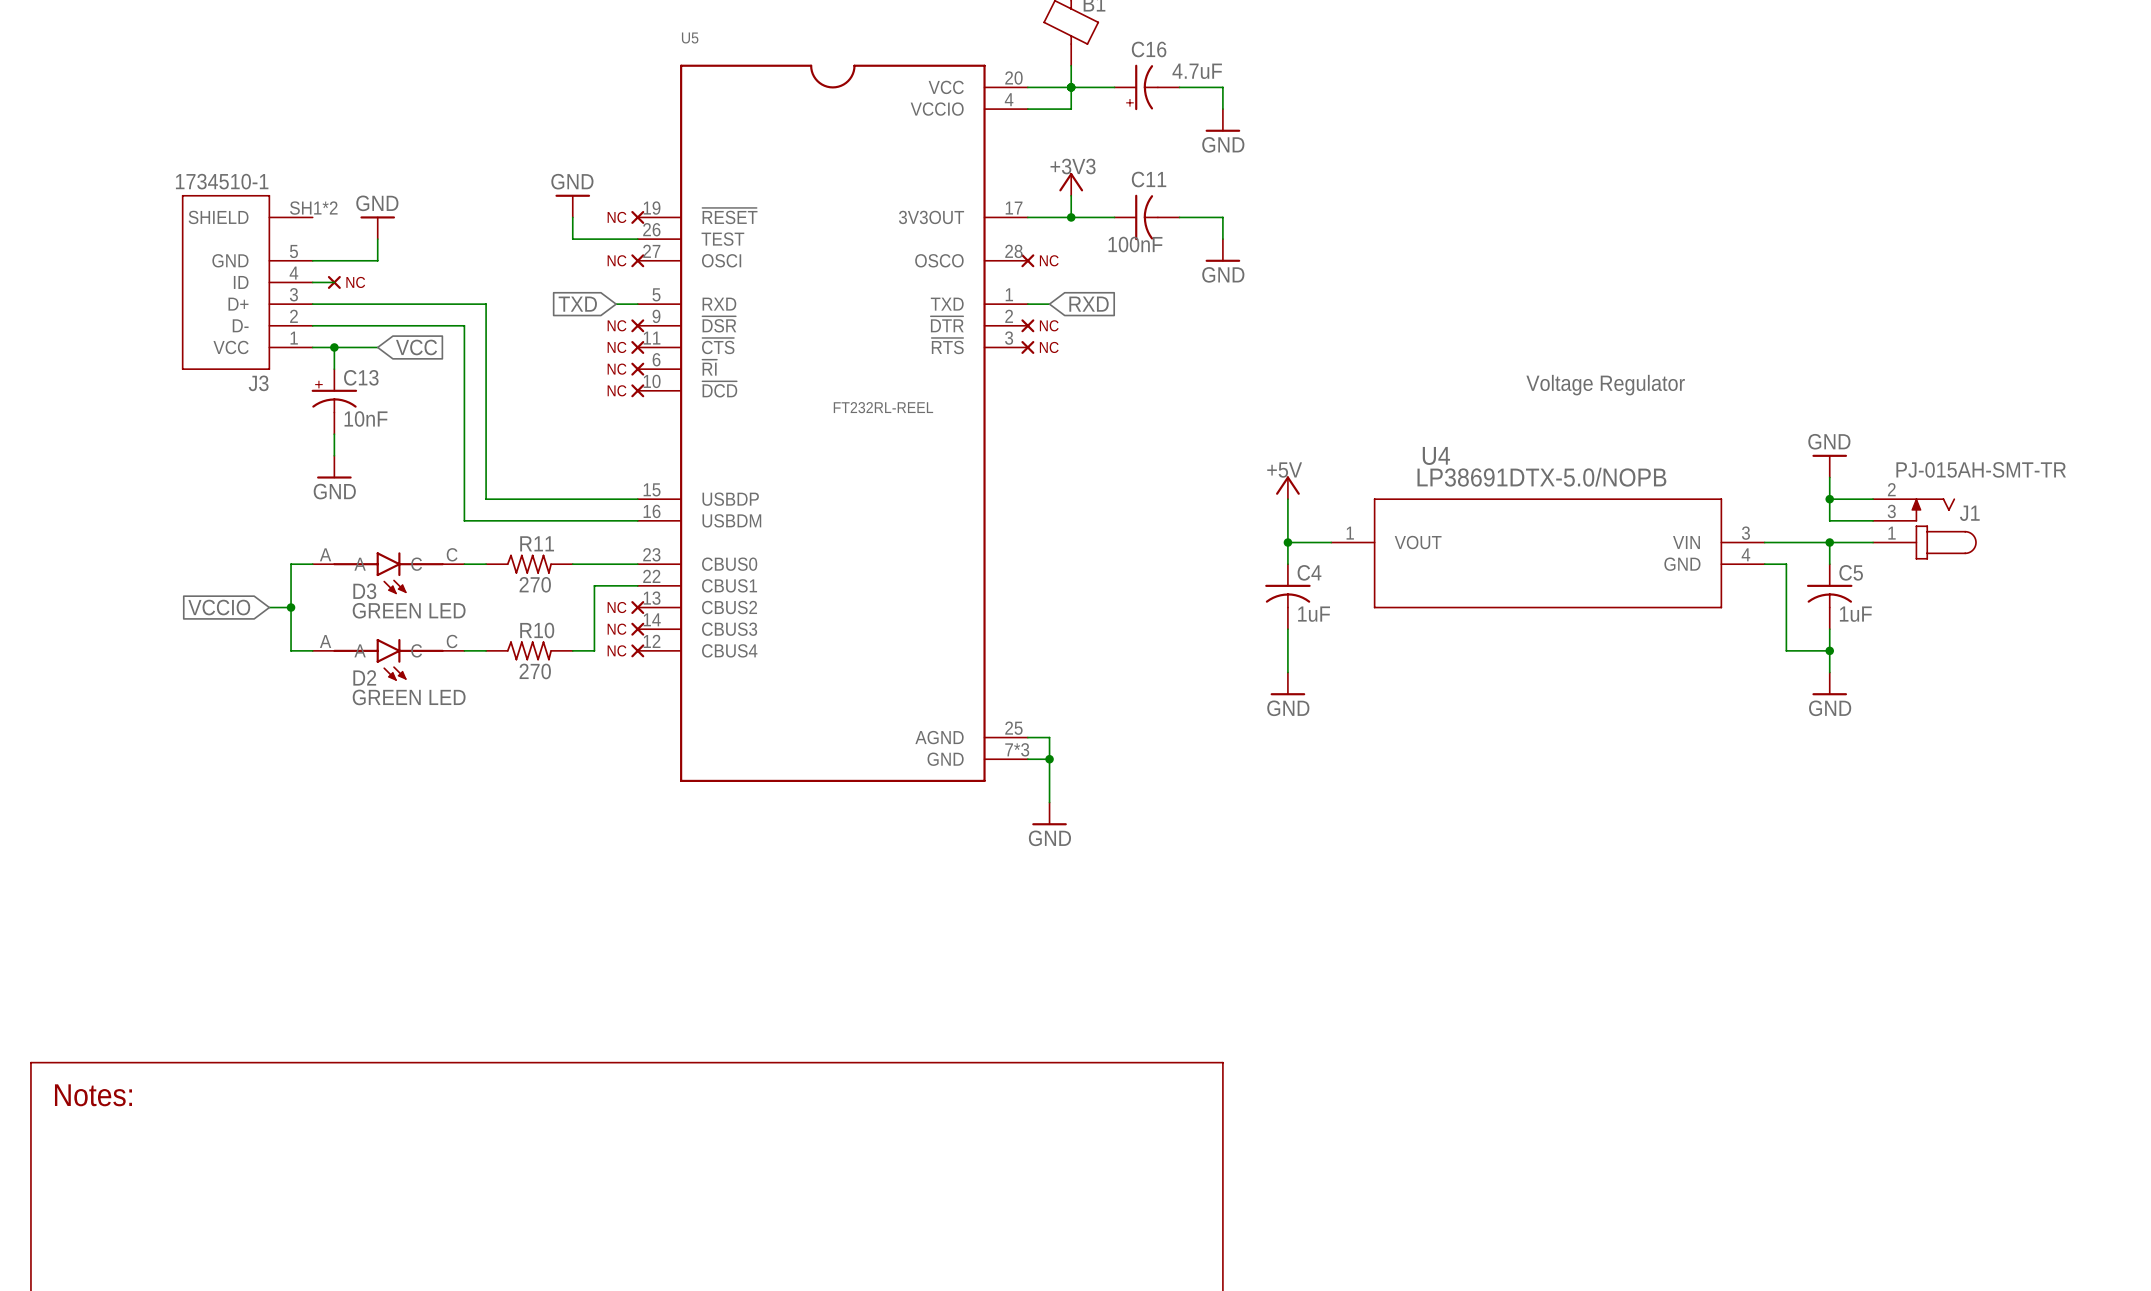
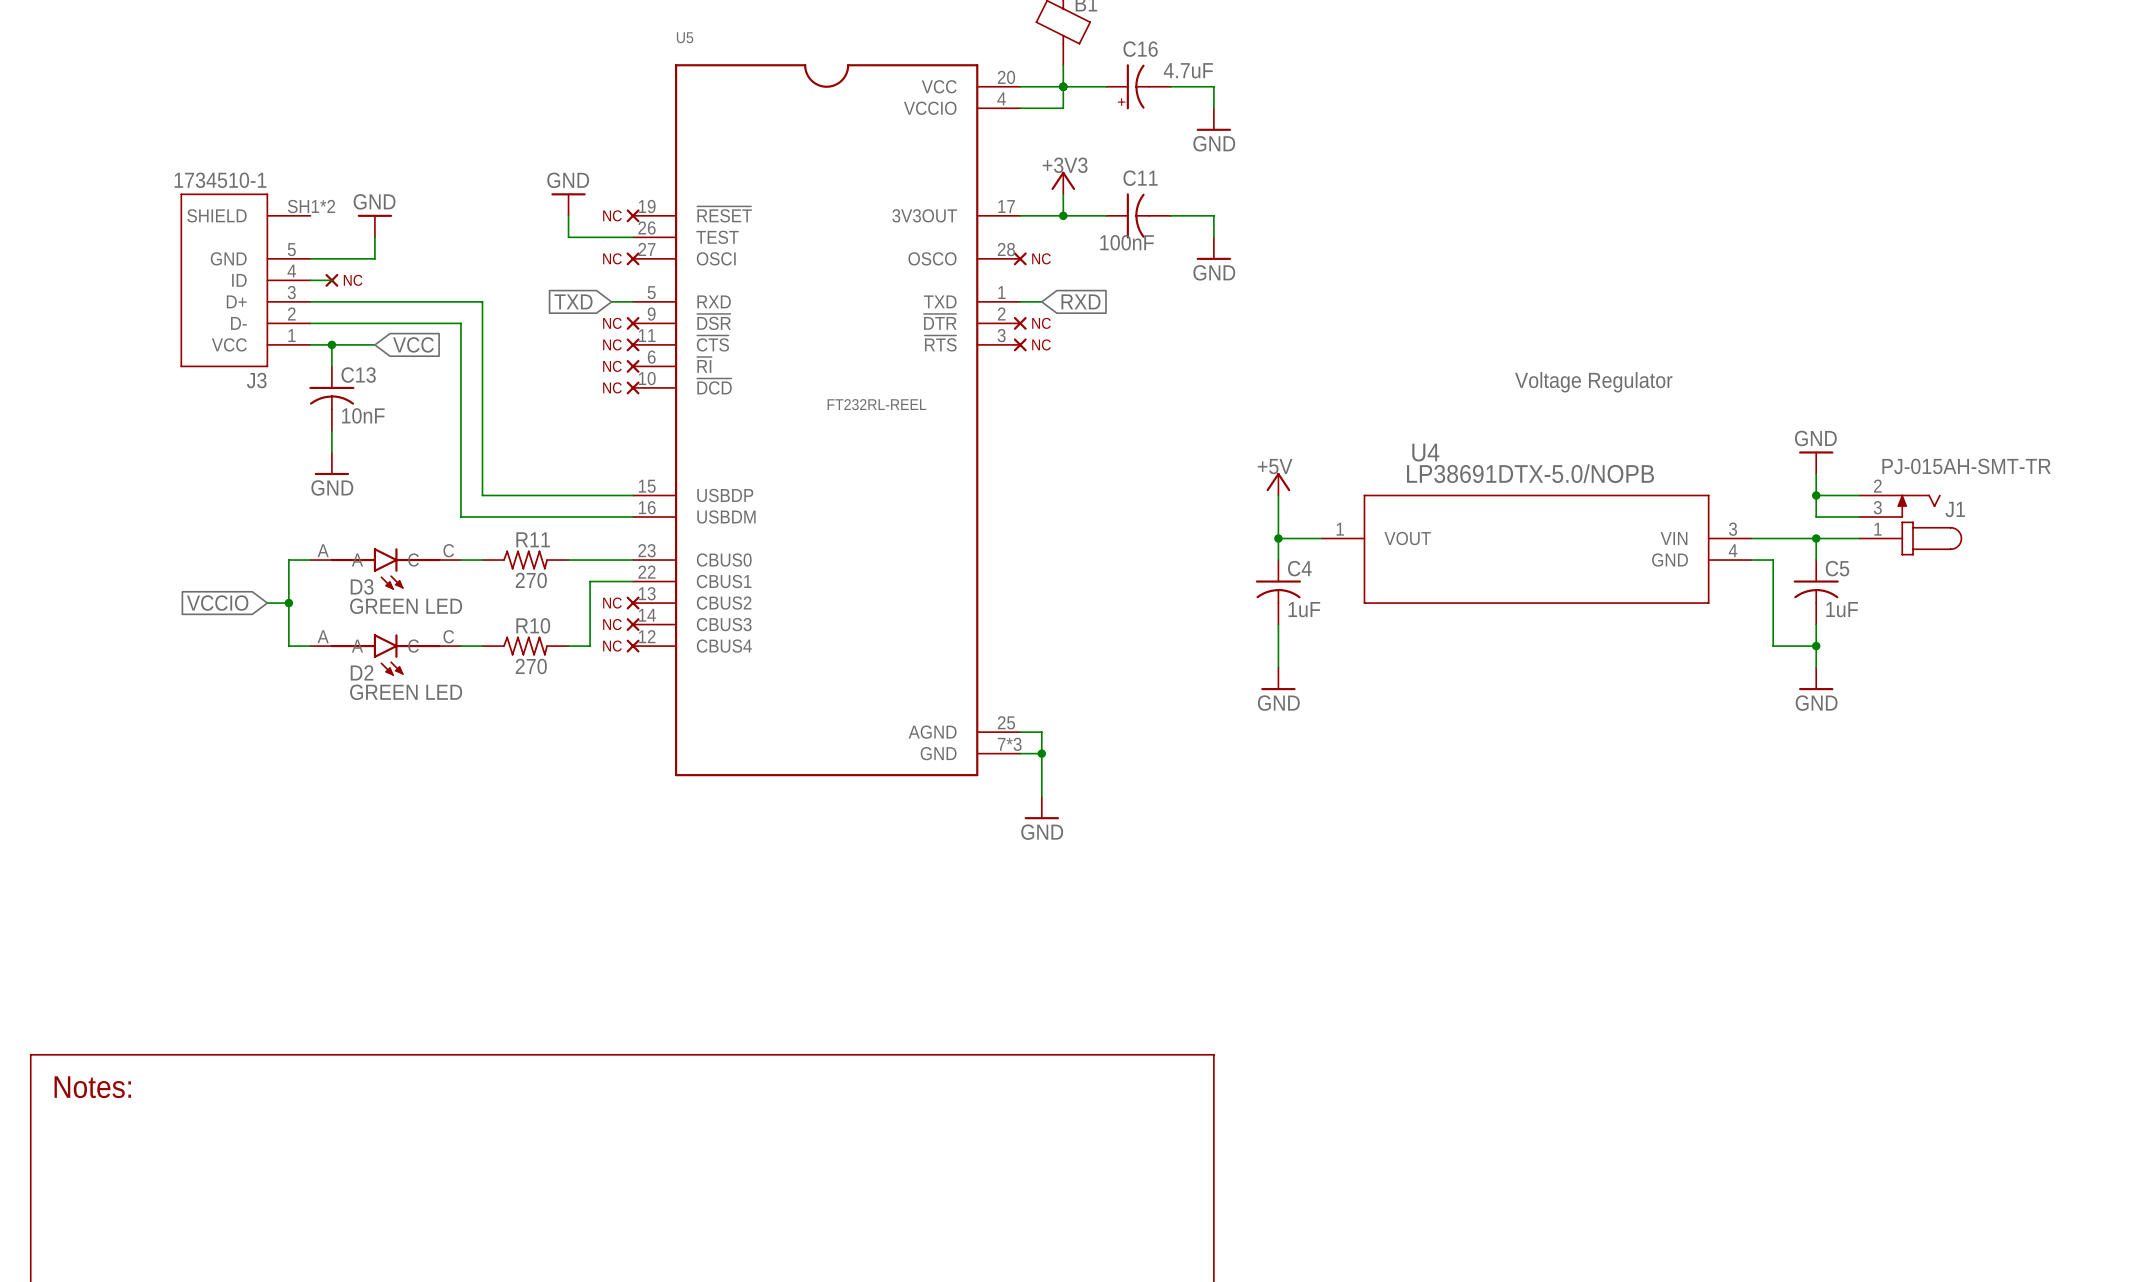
C13 symbol: [311, 369, 358, 435] -> [309, 366, 355, 431]

